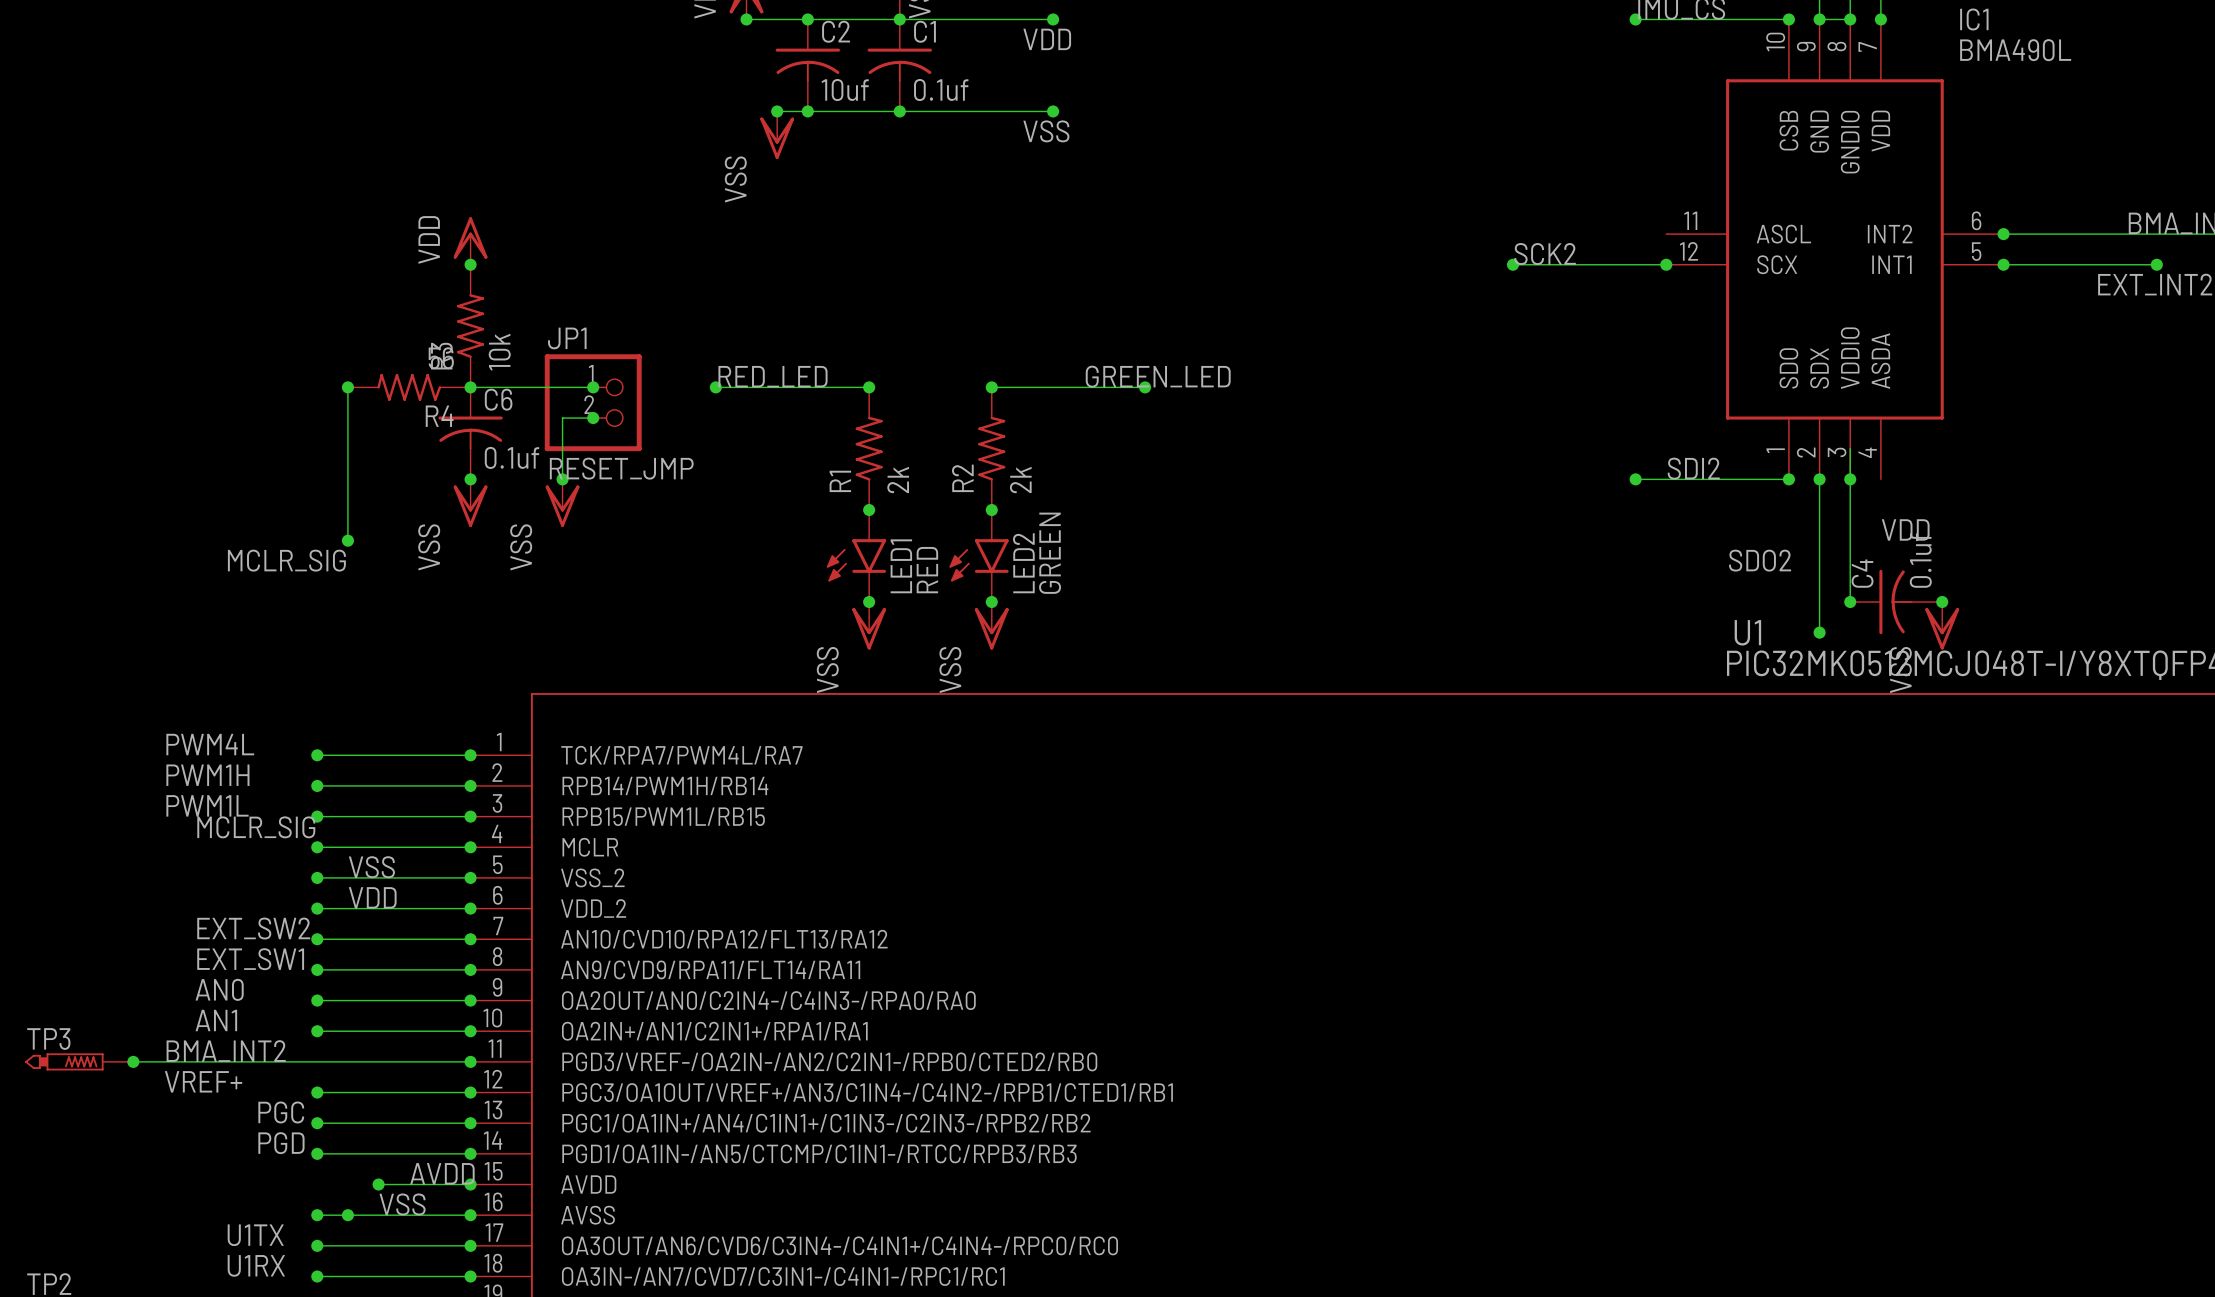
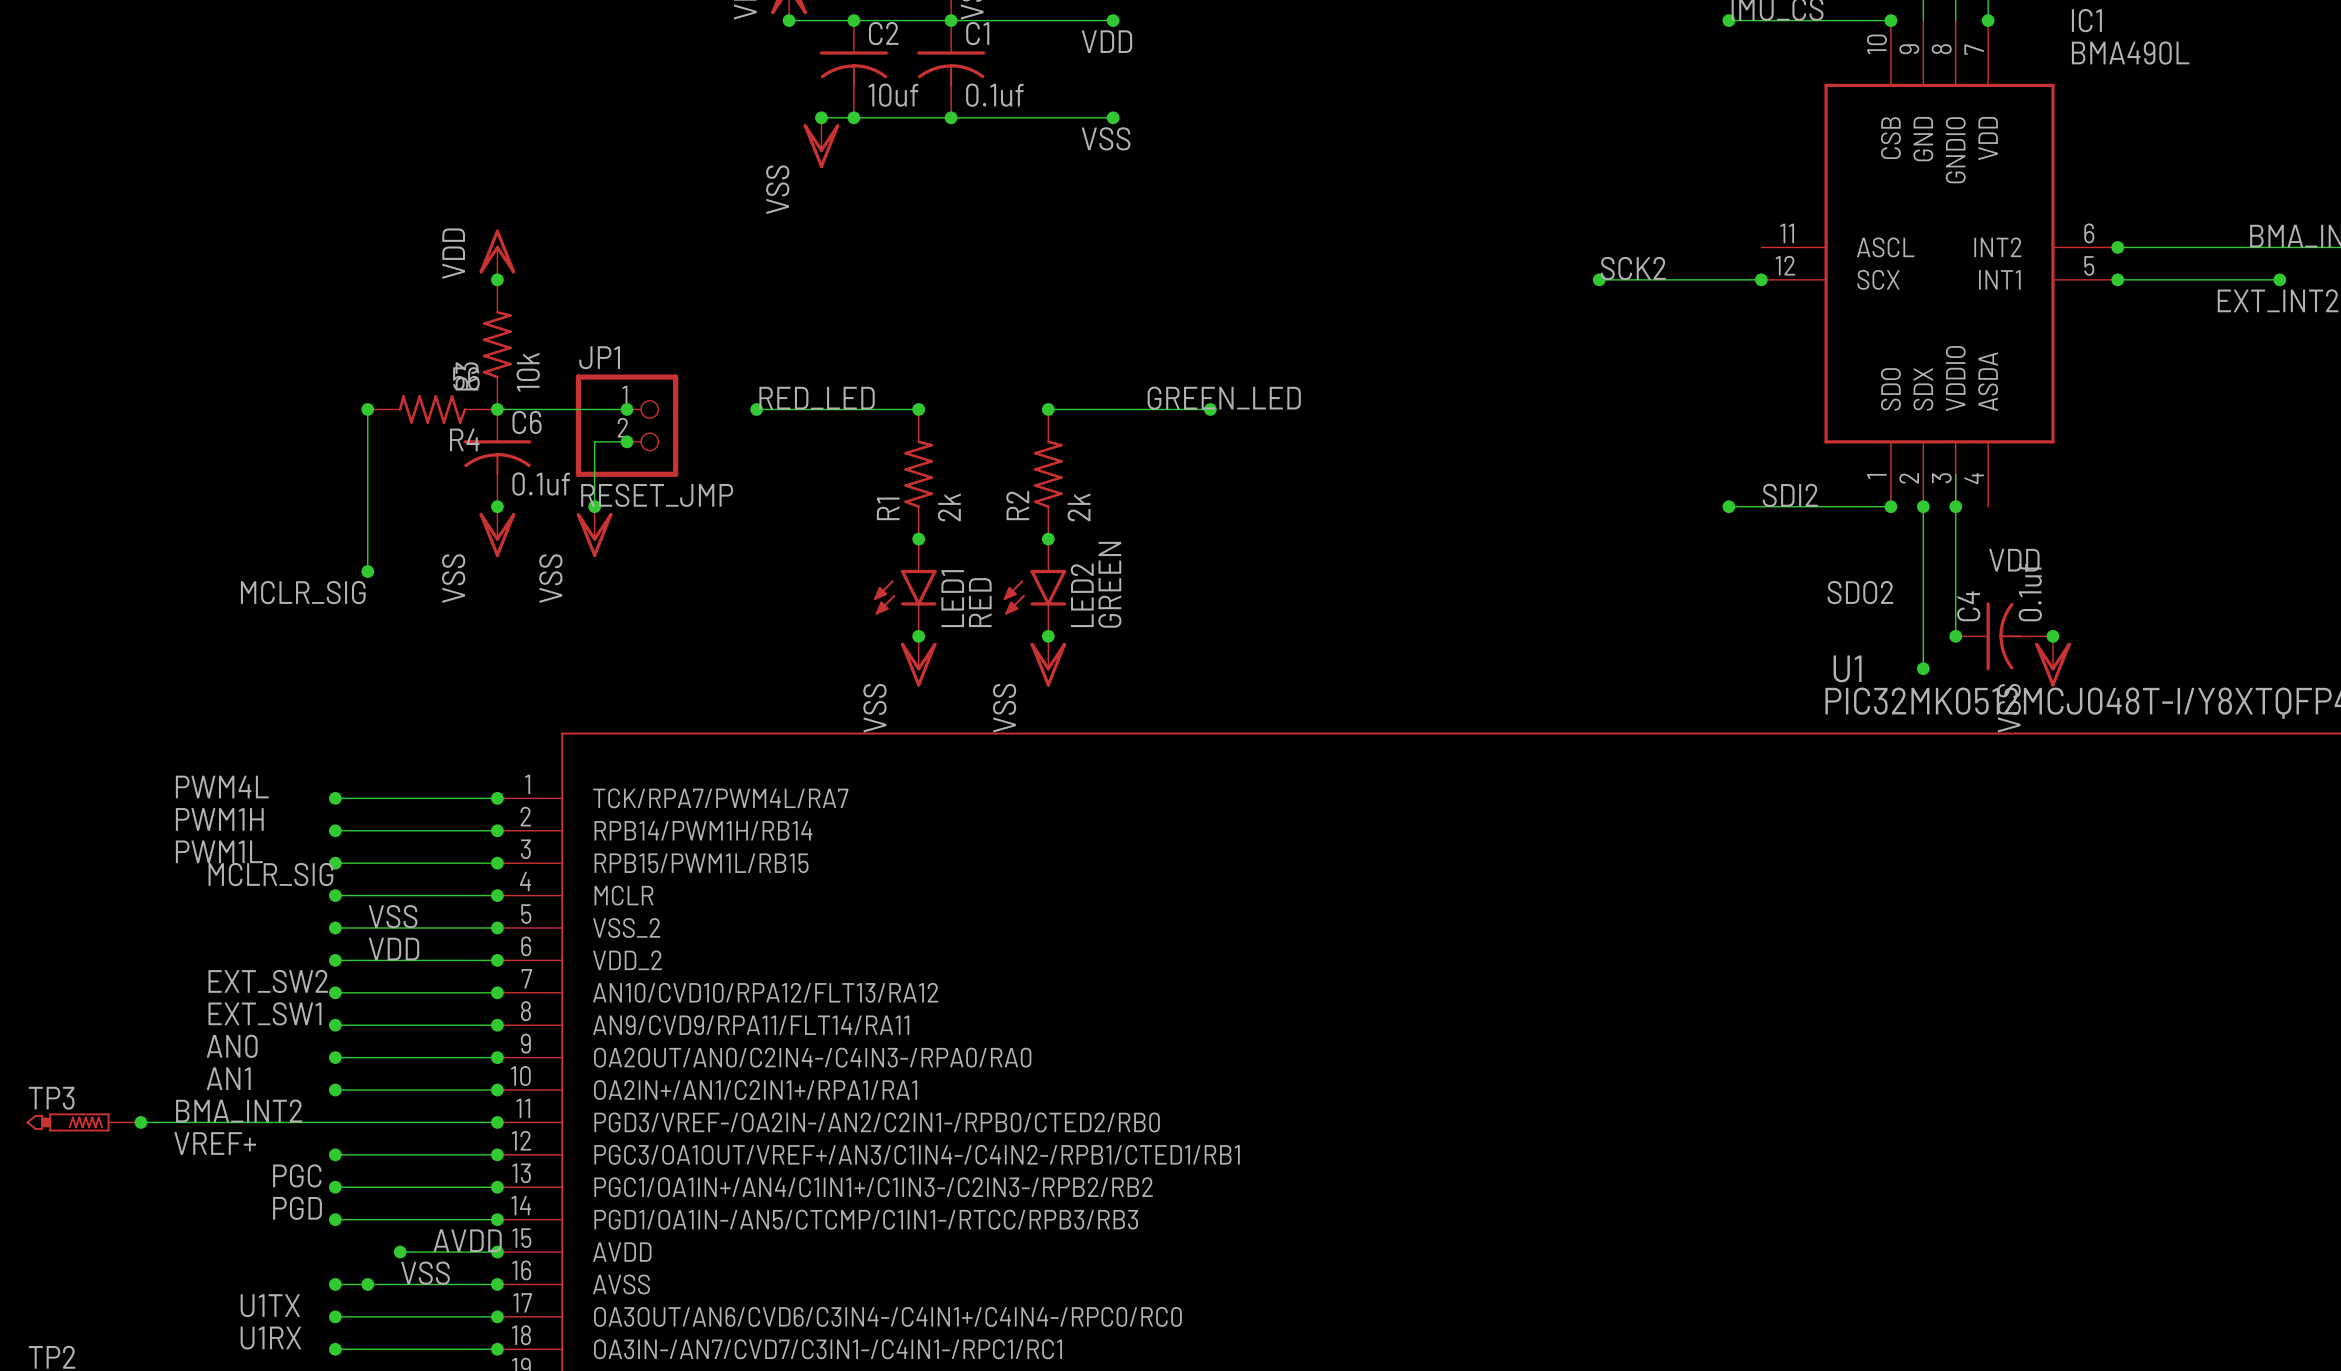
wire: (1819, 19) (1850, 19) -> none
junction: (1819, 19) -> none
junction: (1850, 19) -> none

